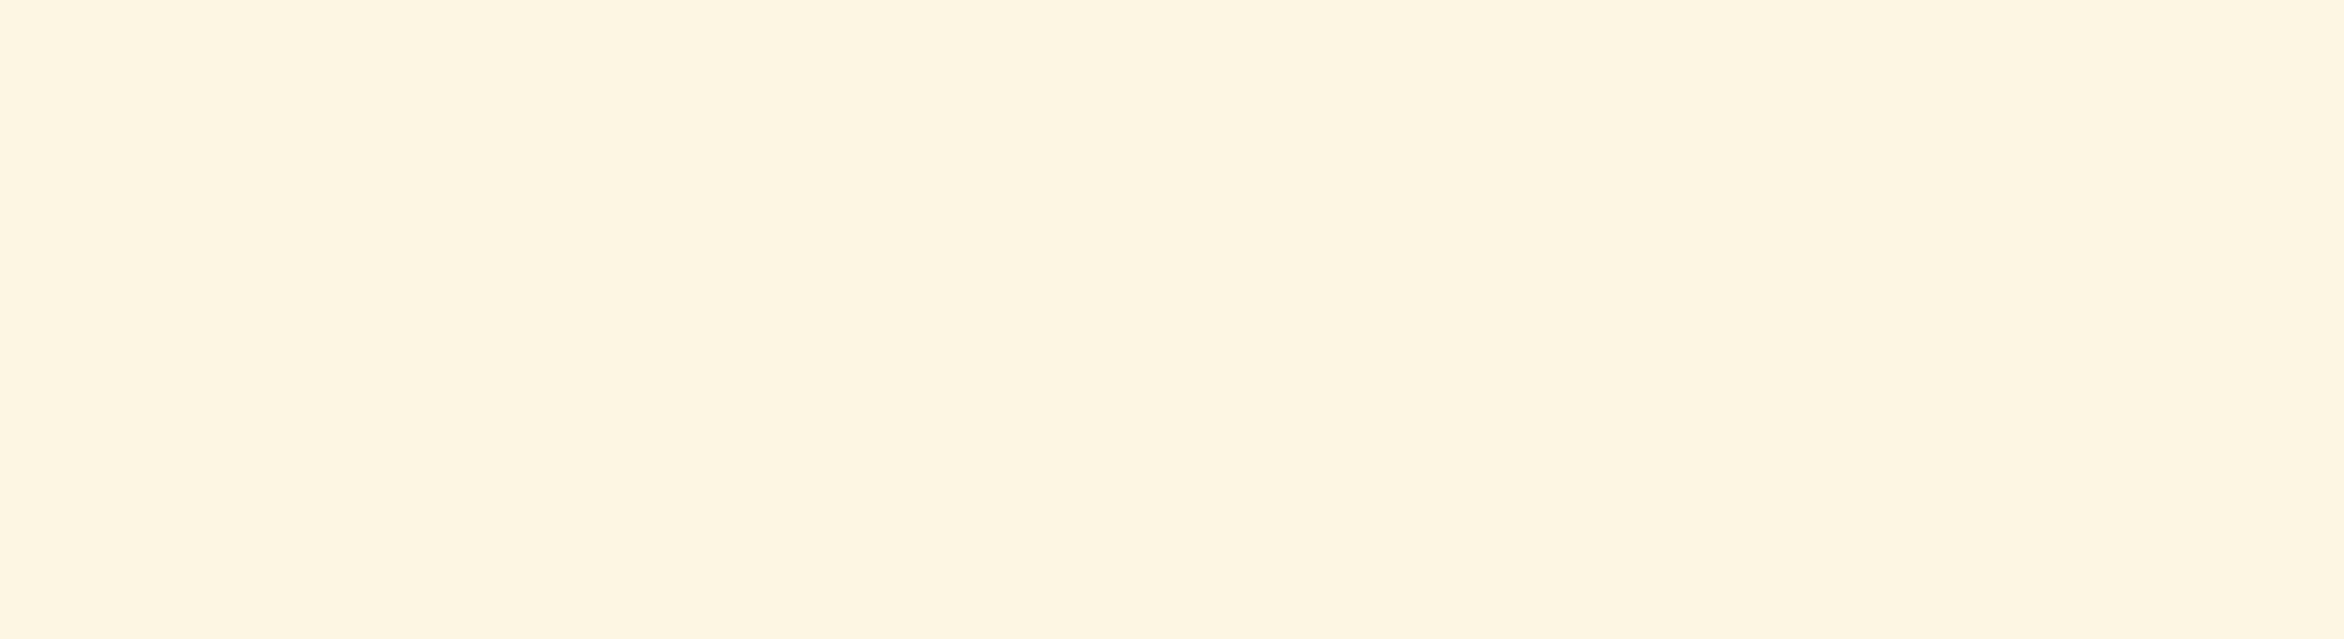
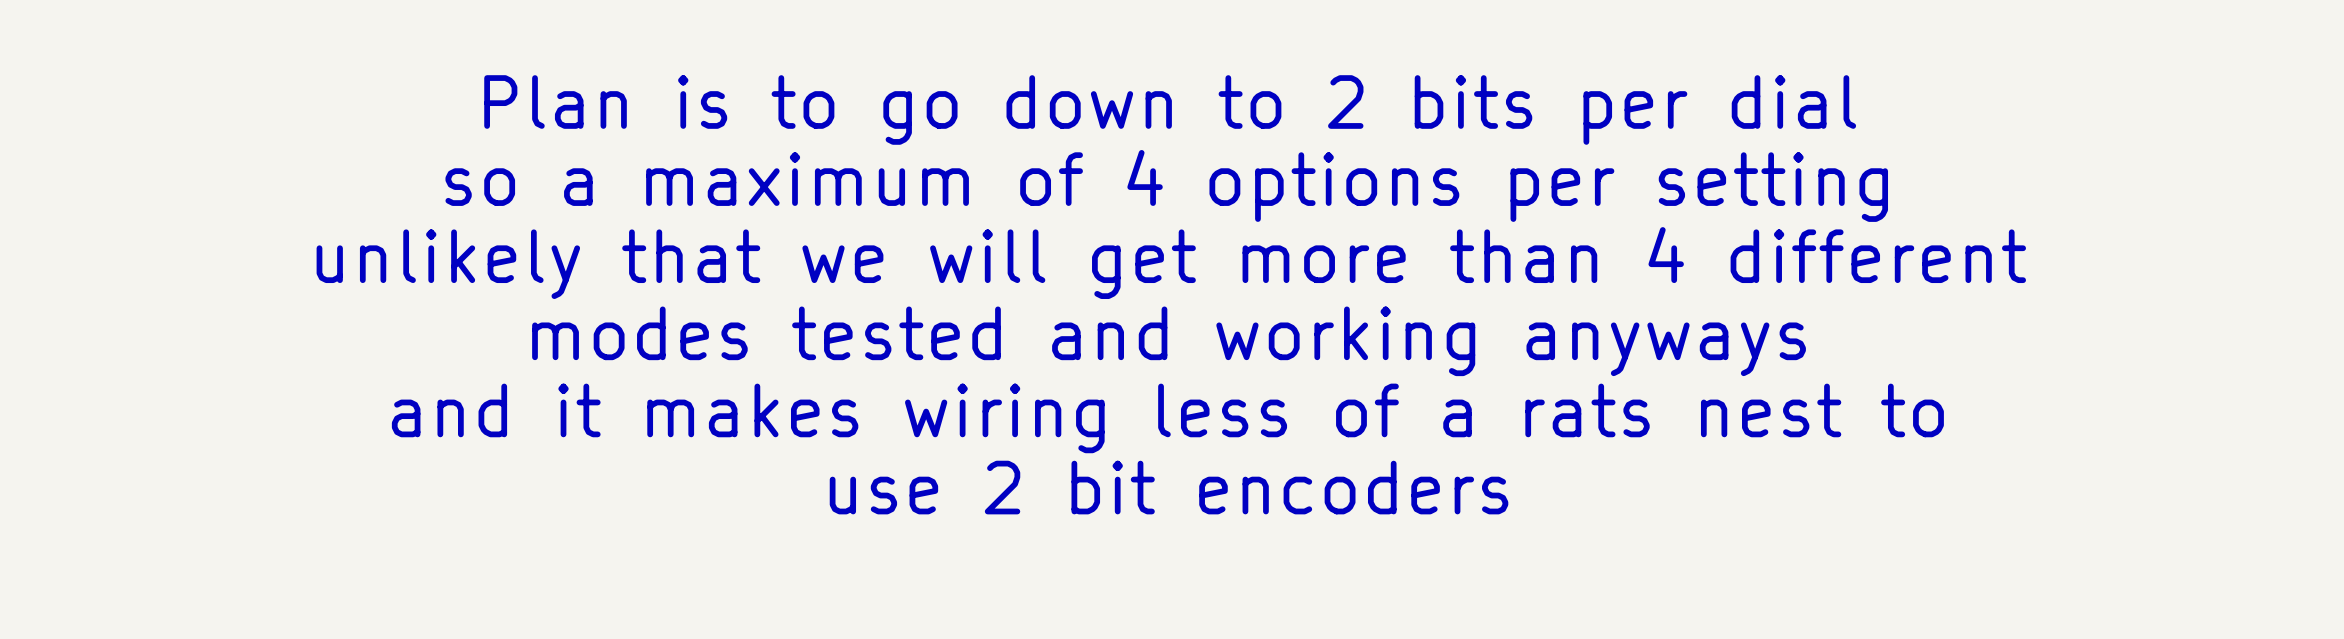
text: none -> Plan is to go down to 2 bits per dial (1170, 109)
text: none -> so a maximum of 4 options per setting (1166, 185)
text: none -> unlikely that we will get more than 4 different (1171, 263)
text: none -> modes tested and working anyways (1169, 341)
text: none -> and it makes wiring less of a rats nest to (1167, 418)
text: none -> use 2 bit encoders (1169, 487)

